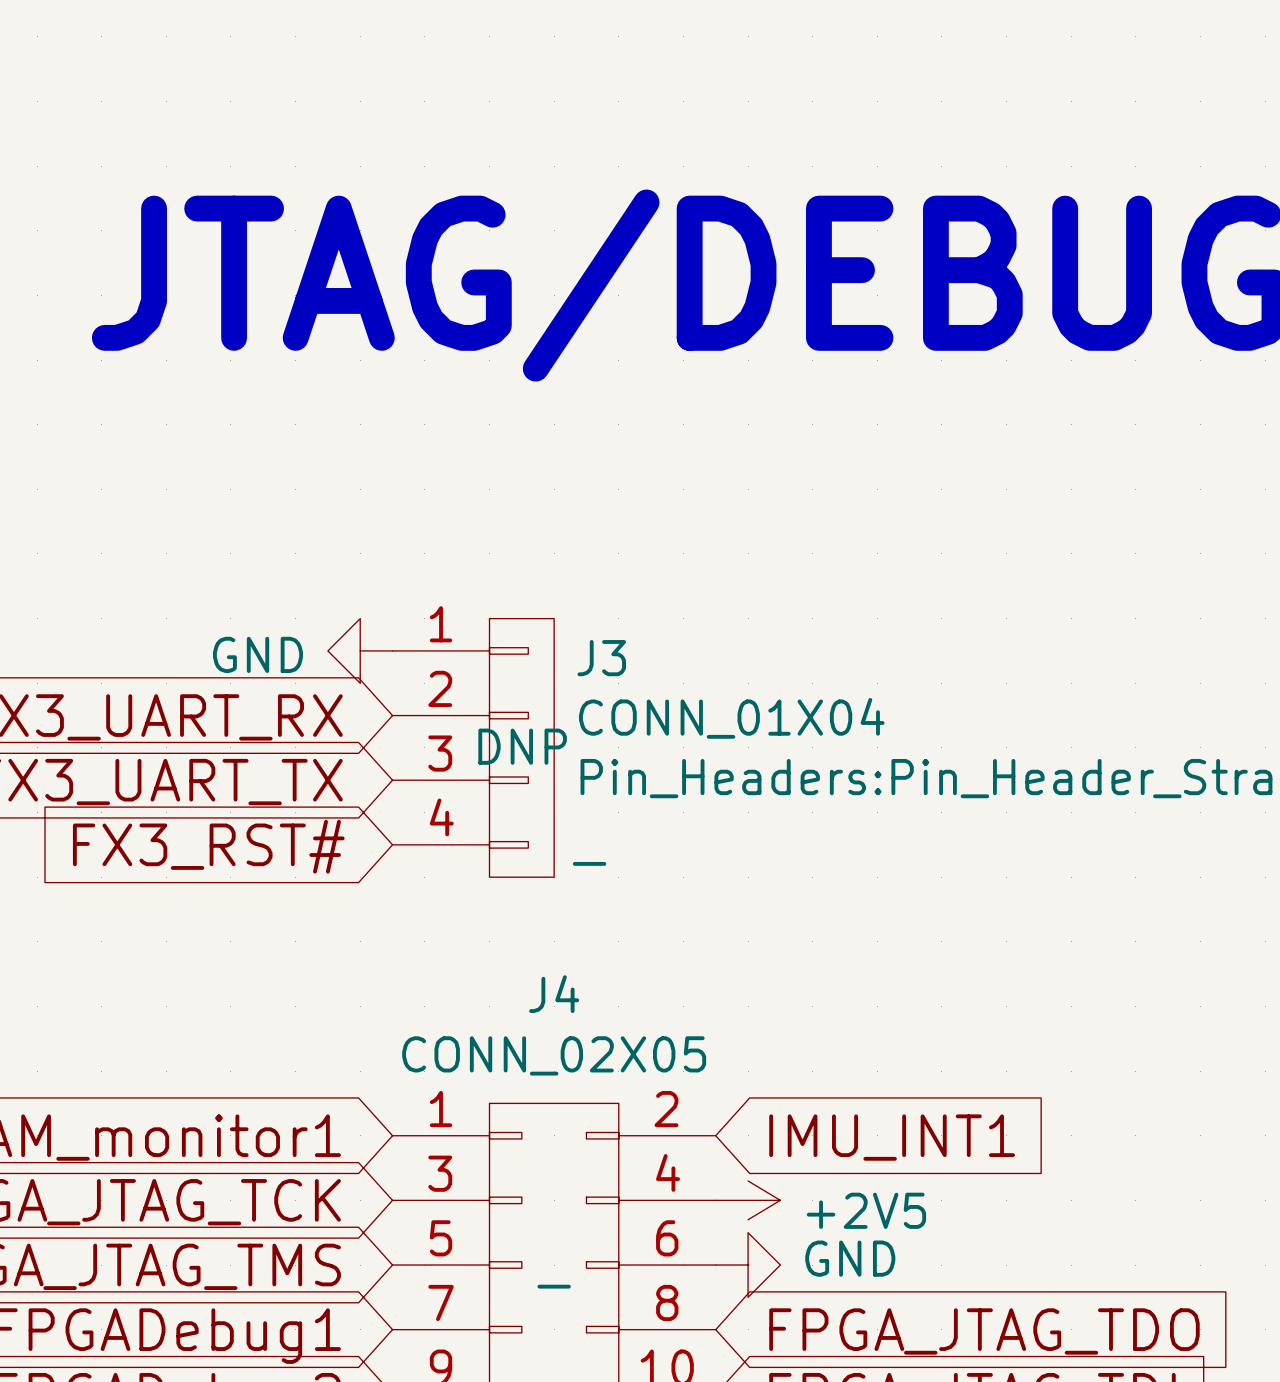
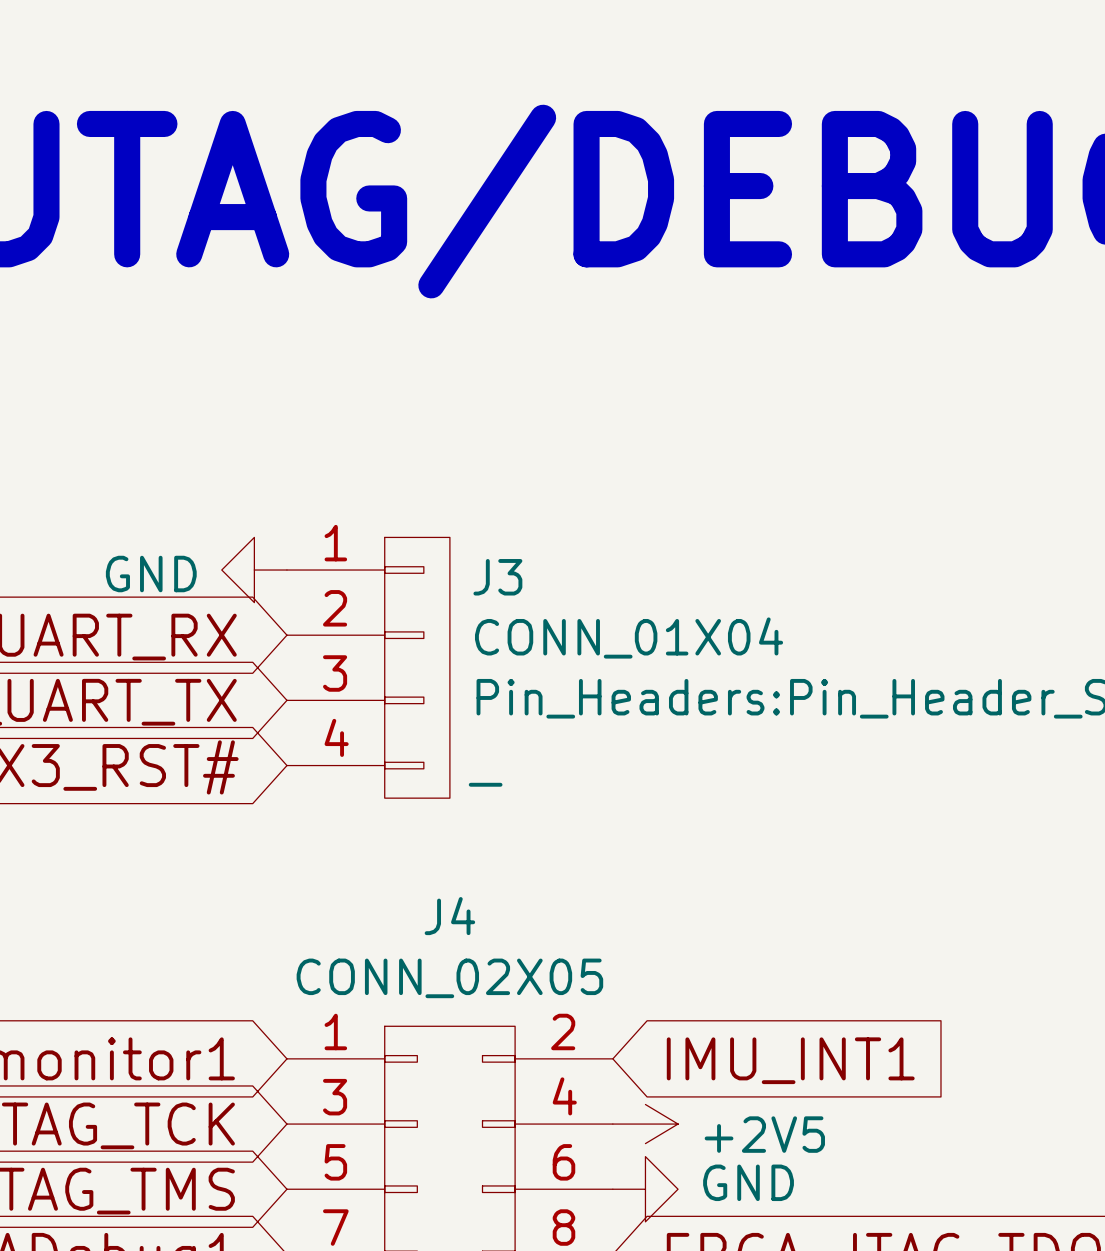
J3 text: DNP (522, 746) -> none
J4 text: _ (554, 1286) -> none

